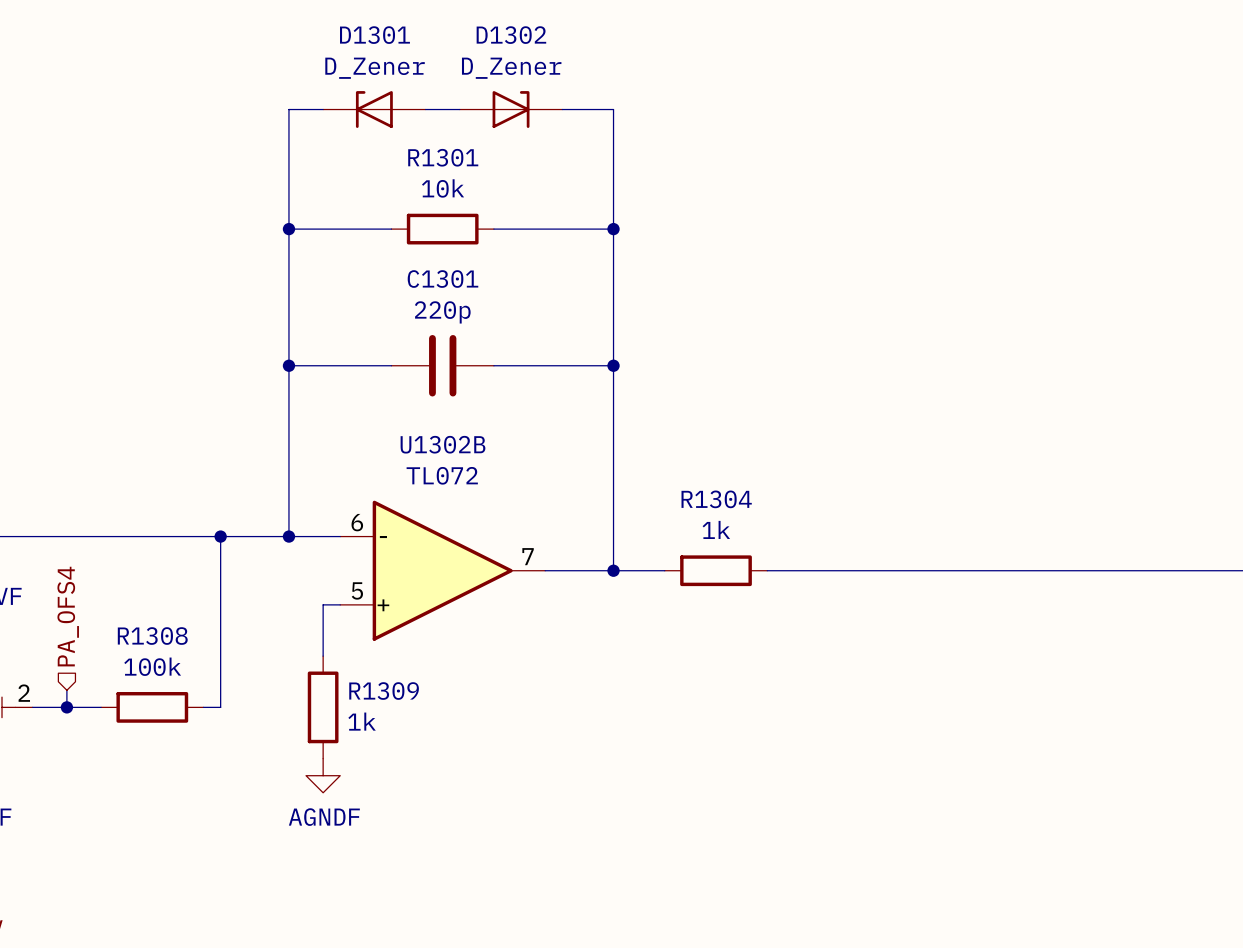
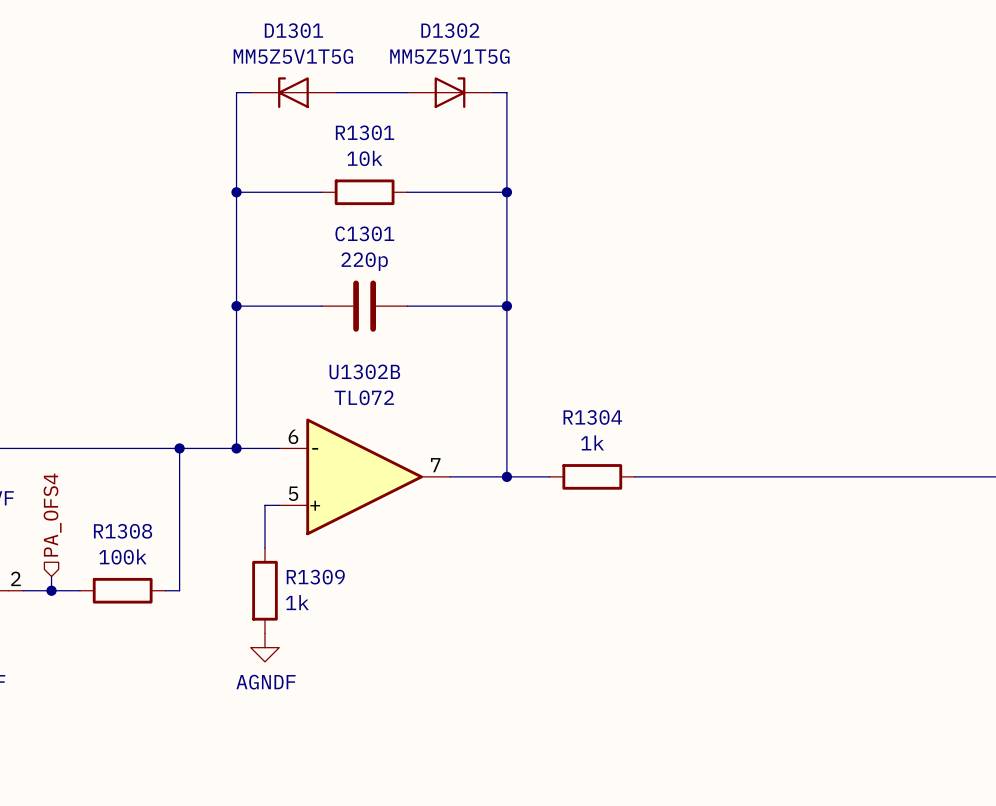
D1301 value: D_Zener (375, 68) -> MM5Z5V1T5G (293, 56)
D1302 value: D_Zener (511, 68) -> MM5Z5V1T5G (449, 56)
D1301 position: (374, 109) -> (293, 92)
D1302 position: (511, 109) -> (449, 92)

